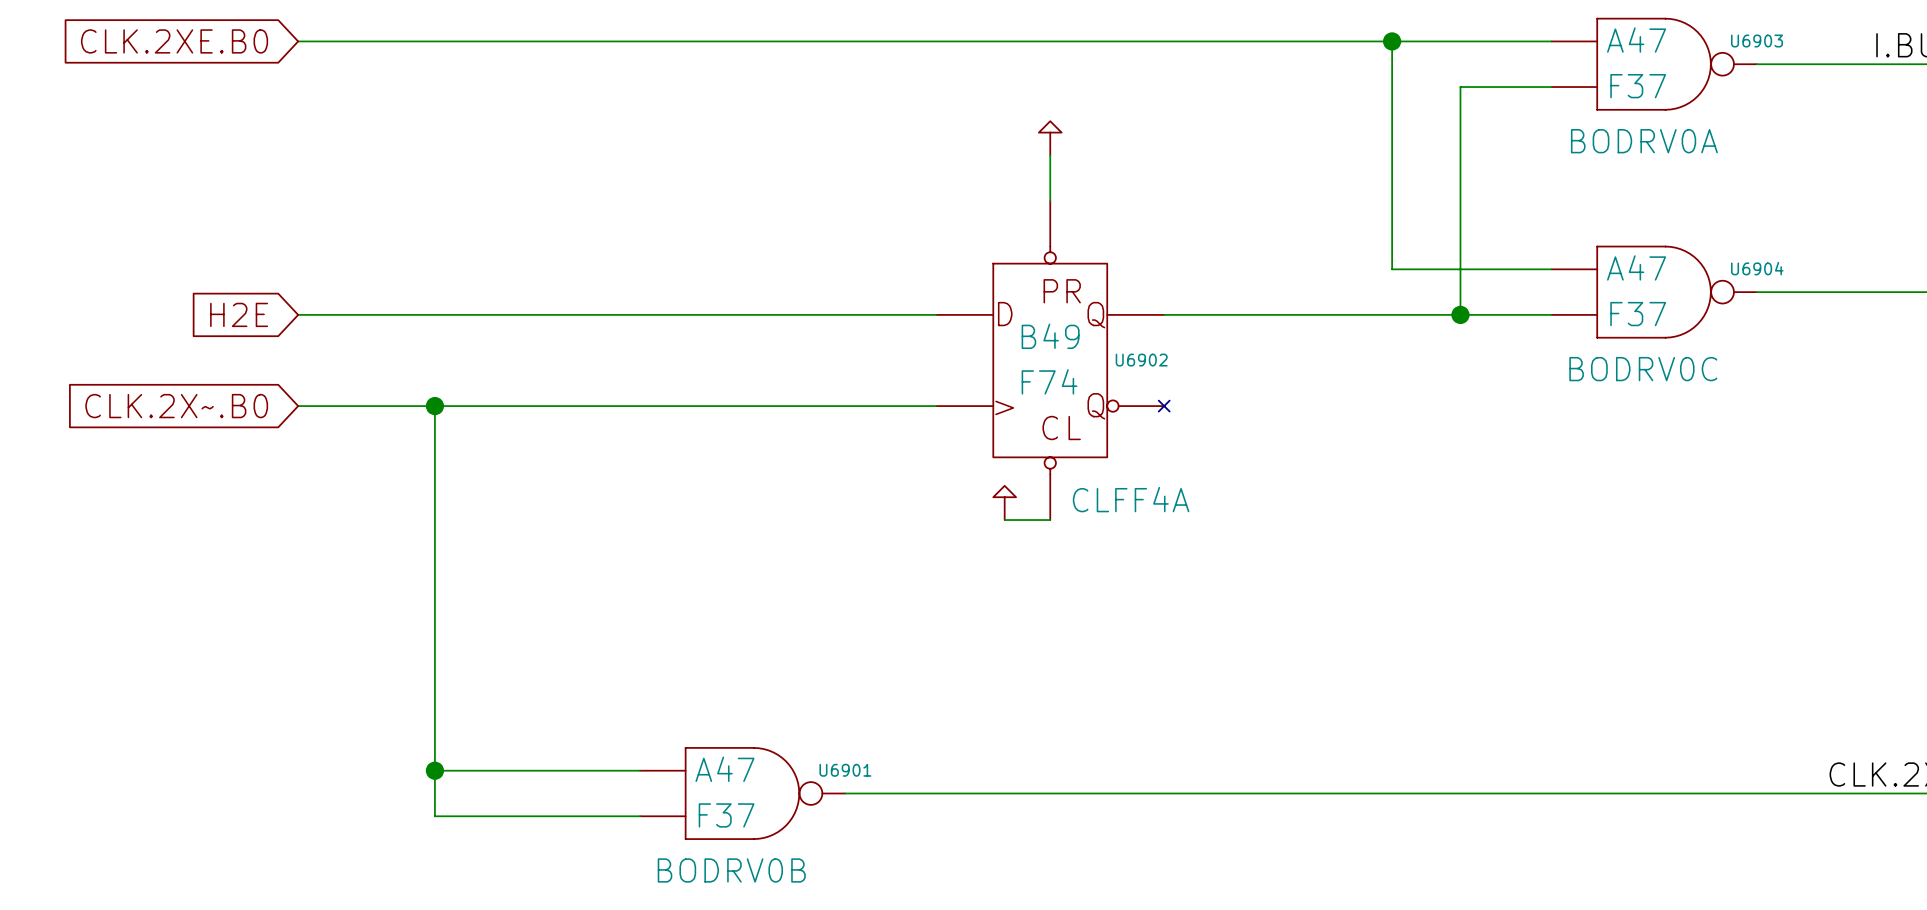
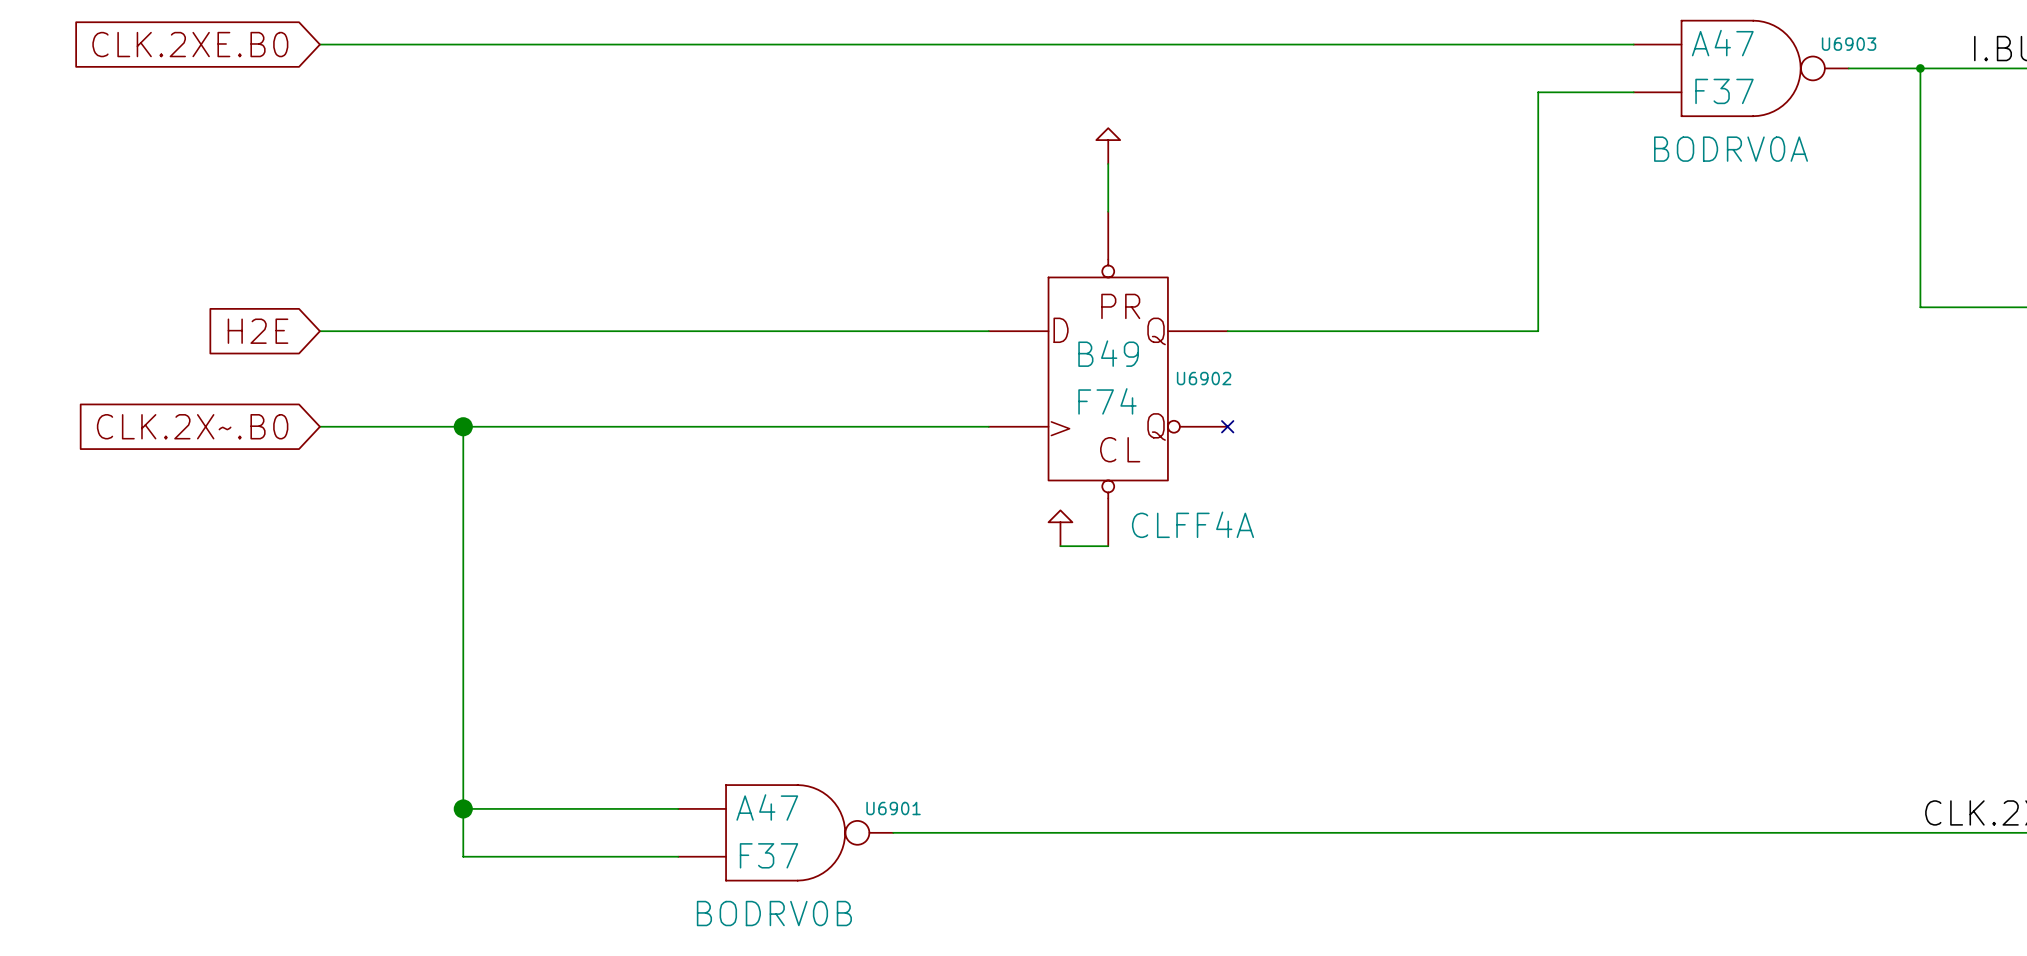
wire: (1392, 41) (1392, 269) (1551, 269) -> none
junction: (1392, 41) -> none
junction: none -> (1920, 68)
U6904: F37 (1654, 292) -> none
wire: (1756, 292) (1825, 292) -> (1920, 68) (1920, 307)
wire: (1460, 314) (1551, 314) -> none
junction: (1460, 314) -> none

